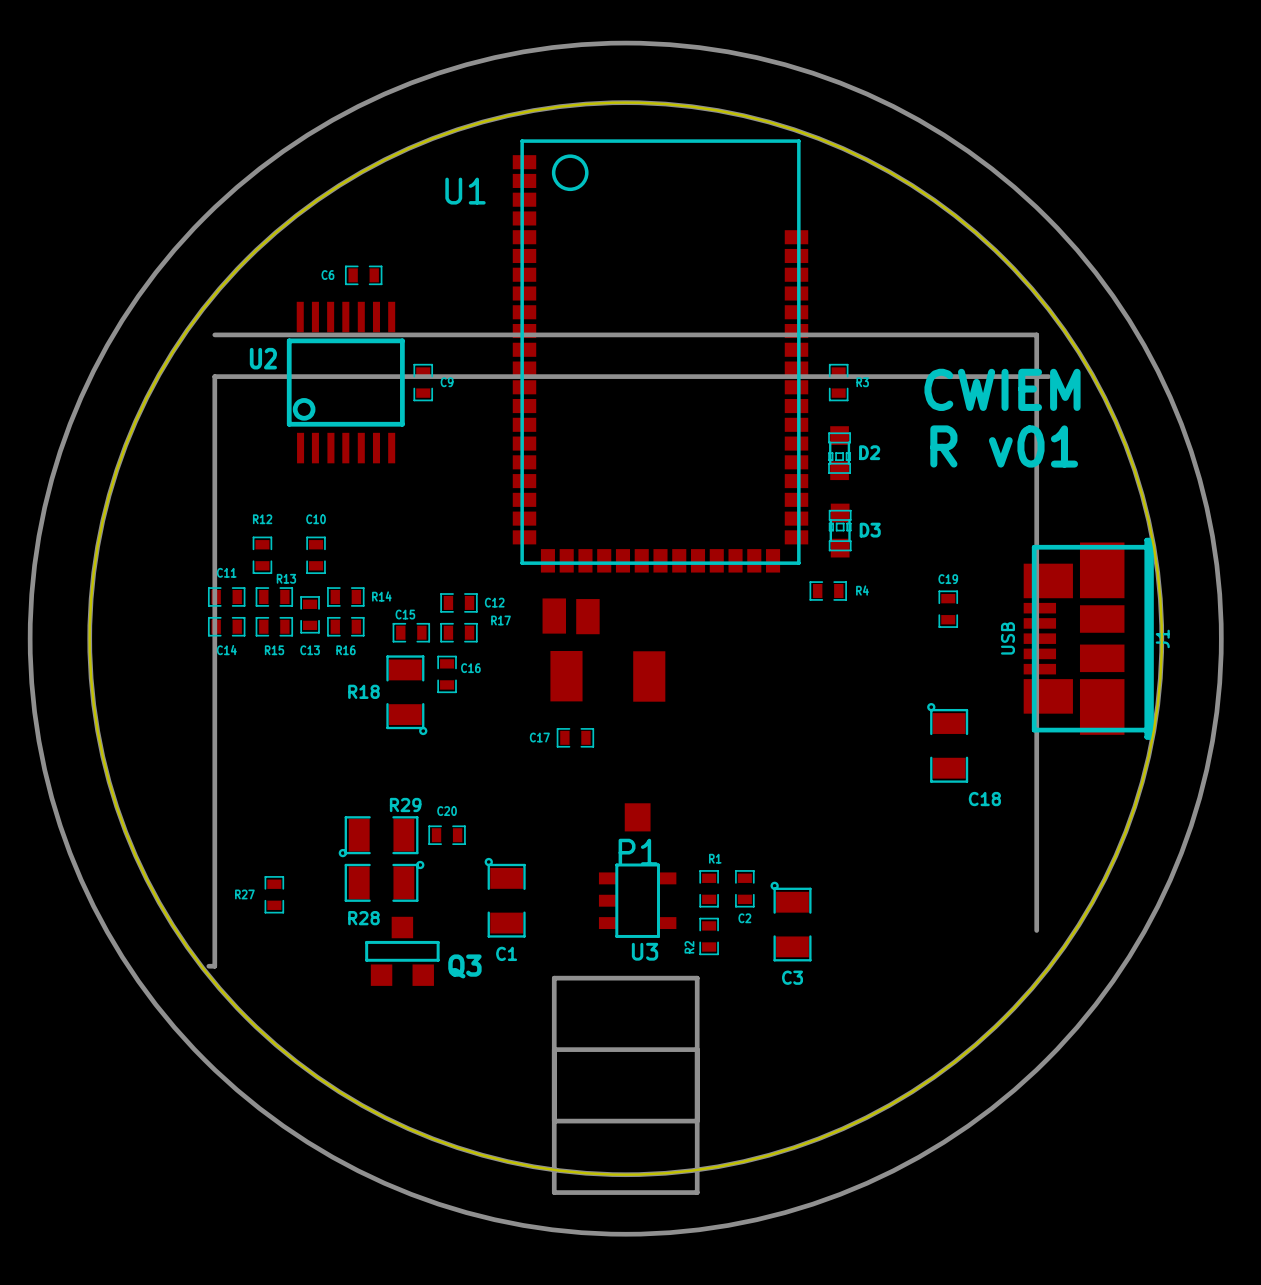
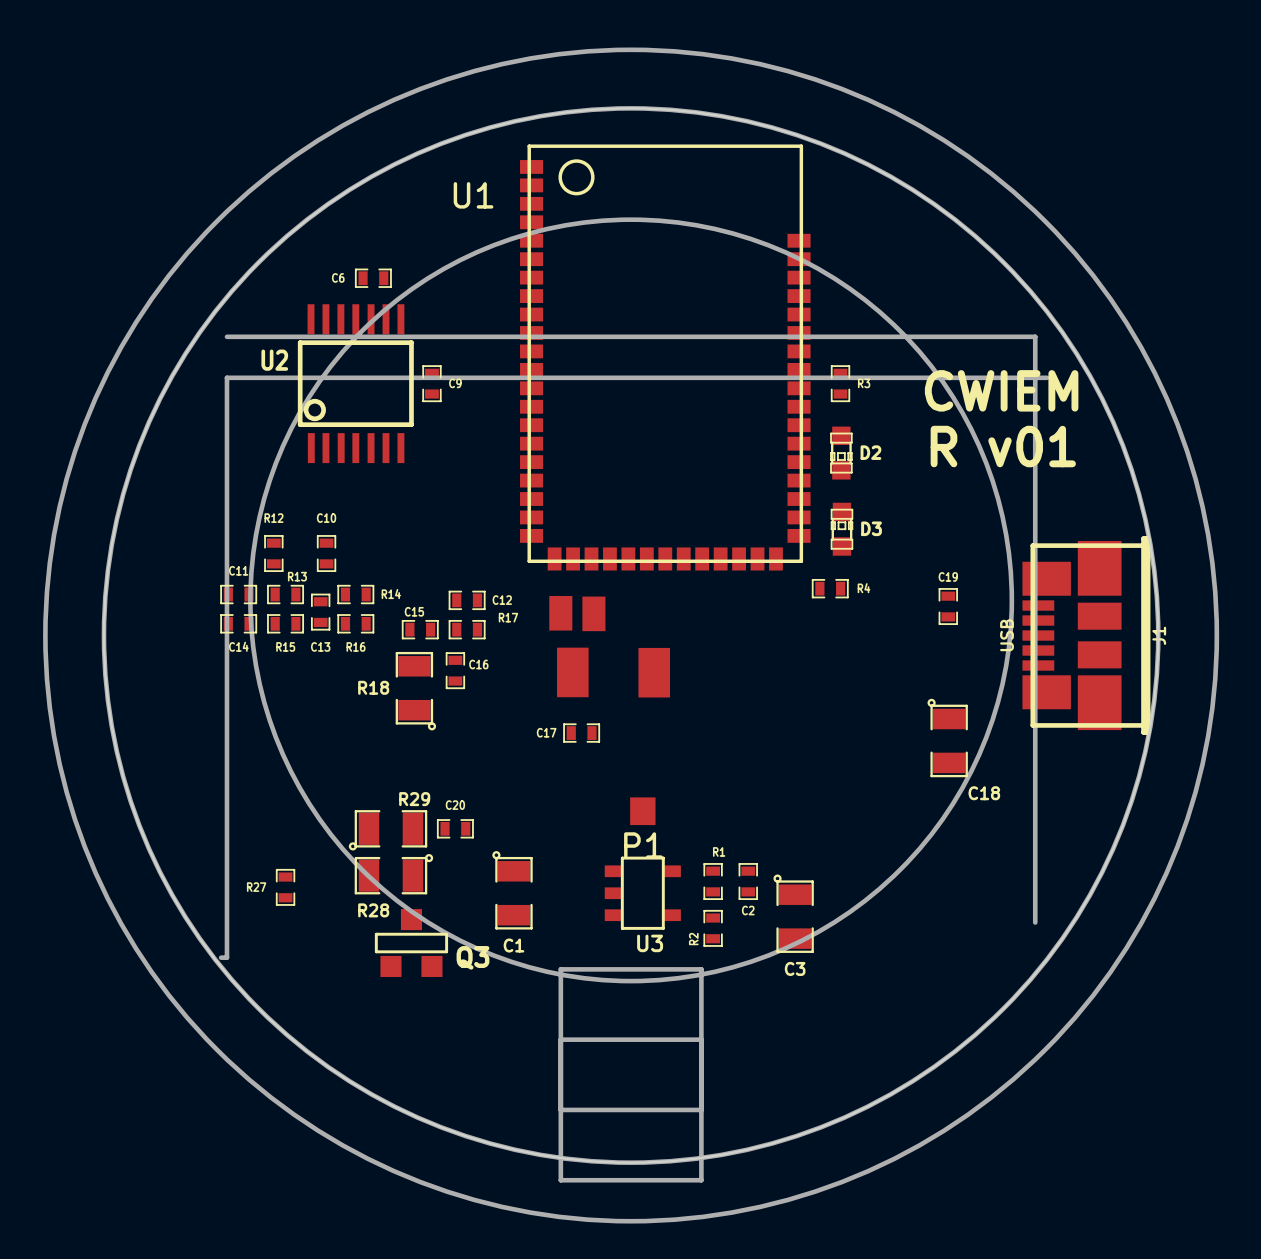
drawing: none -> [248, 217, 1015, 984]

